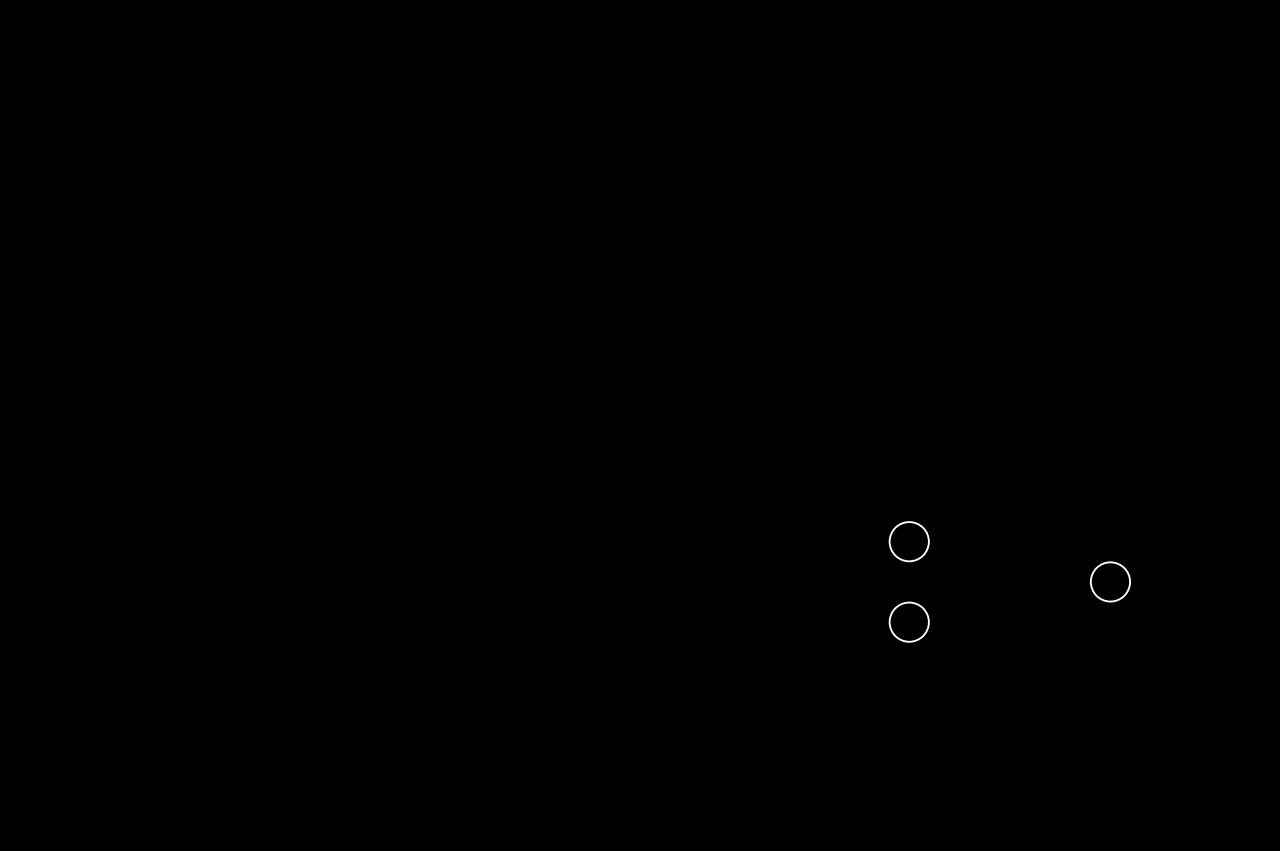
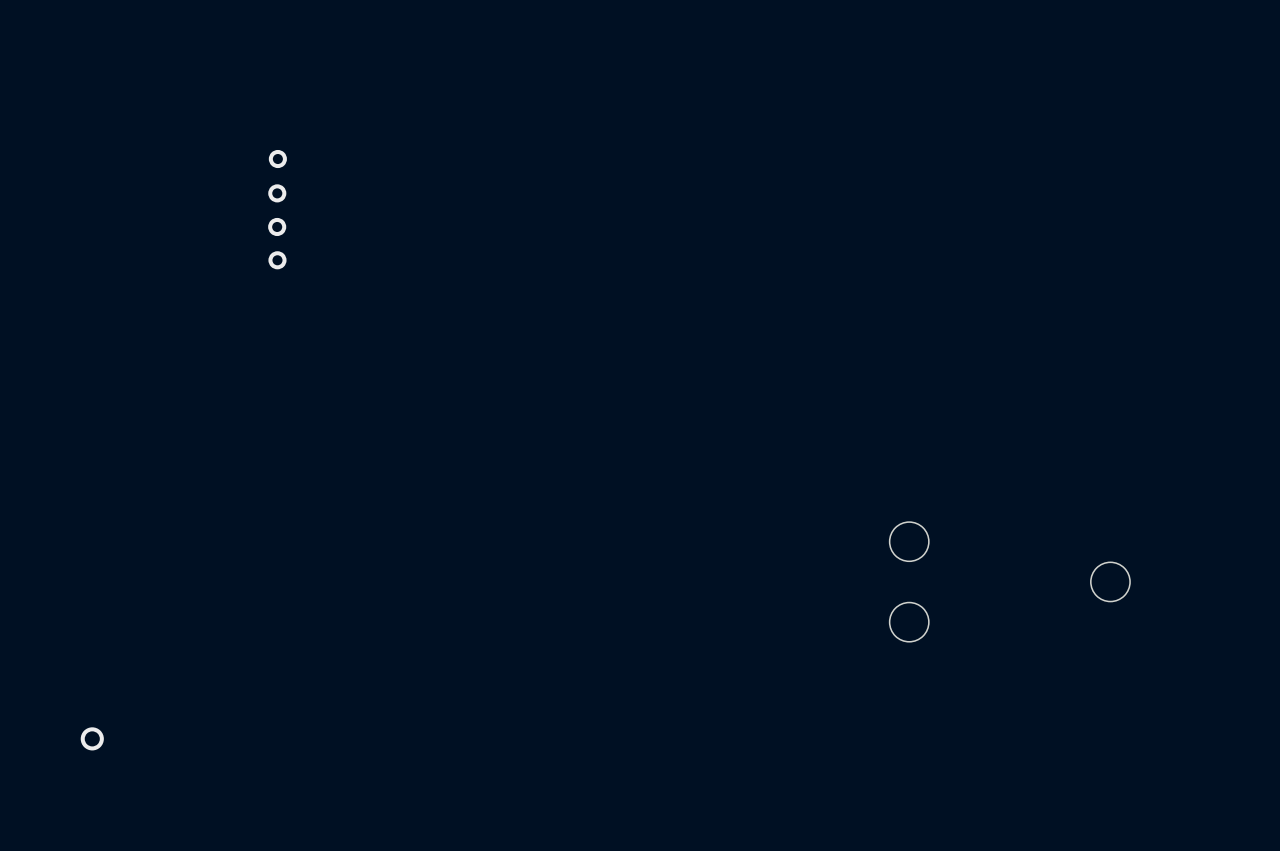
via: none -> (277, 159)
via: none -> (277, 193)
via: none -> (277, 226)
via: none -> (277, 260)
via: none -> (92, 738)

